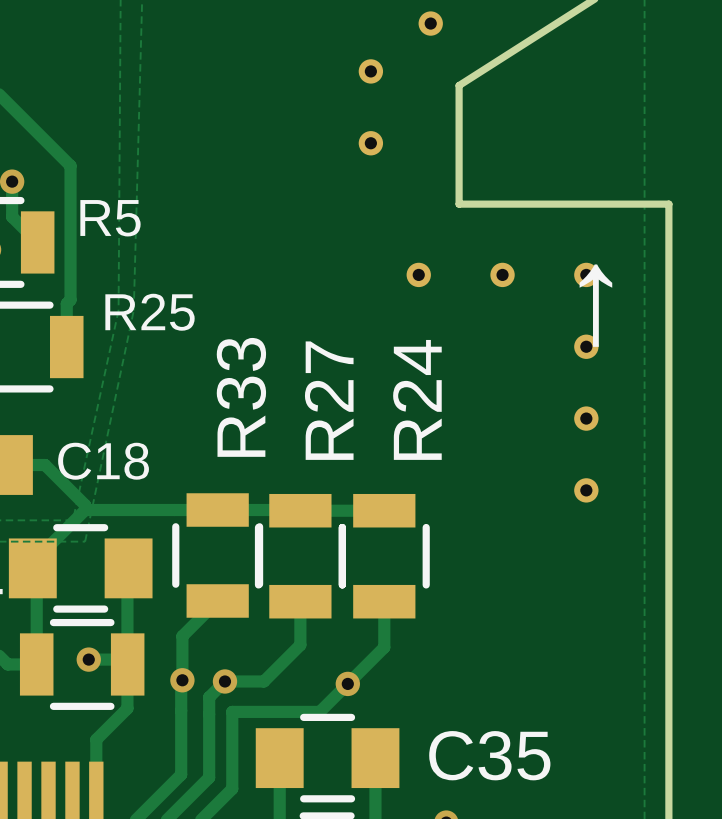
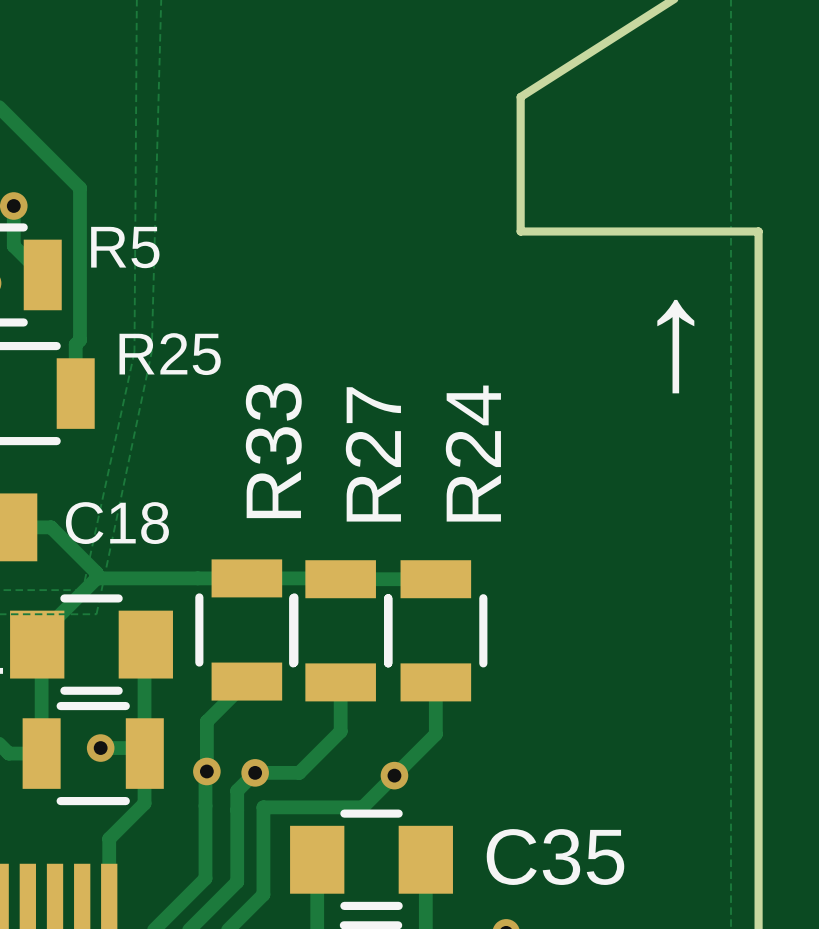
part: (430, 23) -> none
part: (370, 71) -> none
part: (370, 143) -> none
part: (418, 274) -> none
part: (502, 274) -> none
part: (586, 274) -> none
part: (586, 346) -> none
part: (586, 418) -> none
part: (586, 490) -> none

